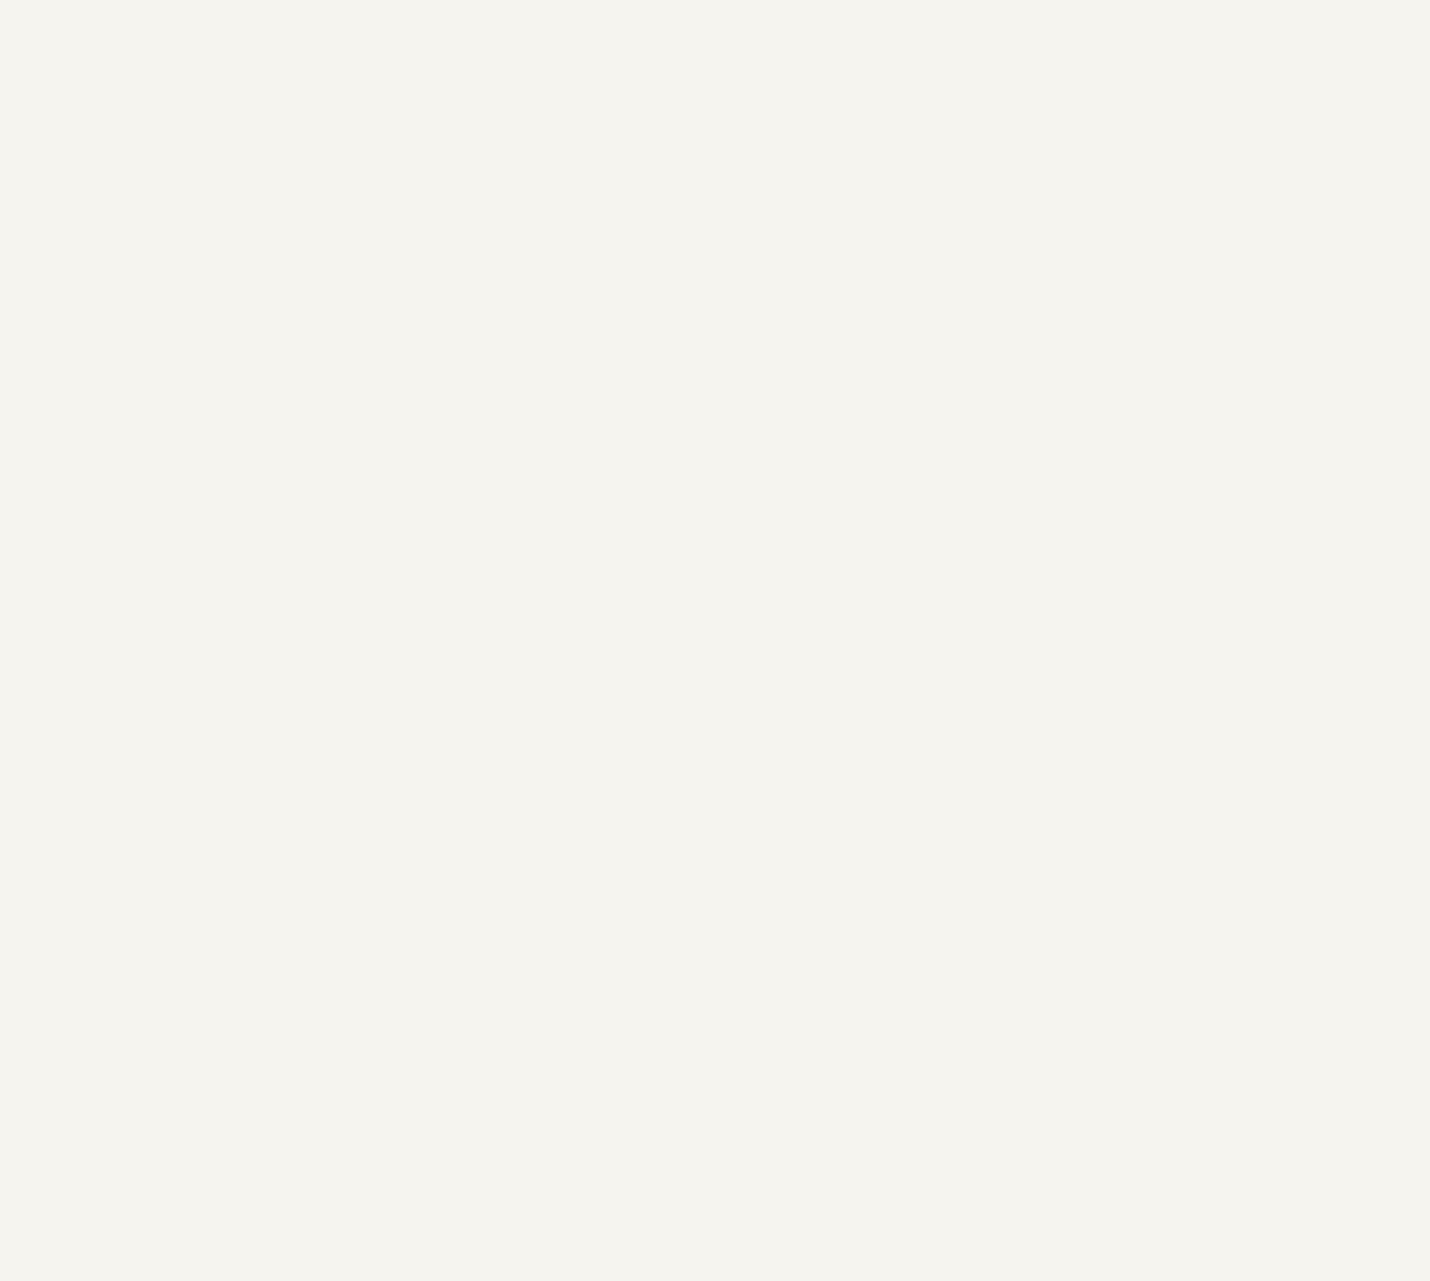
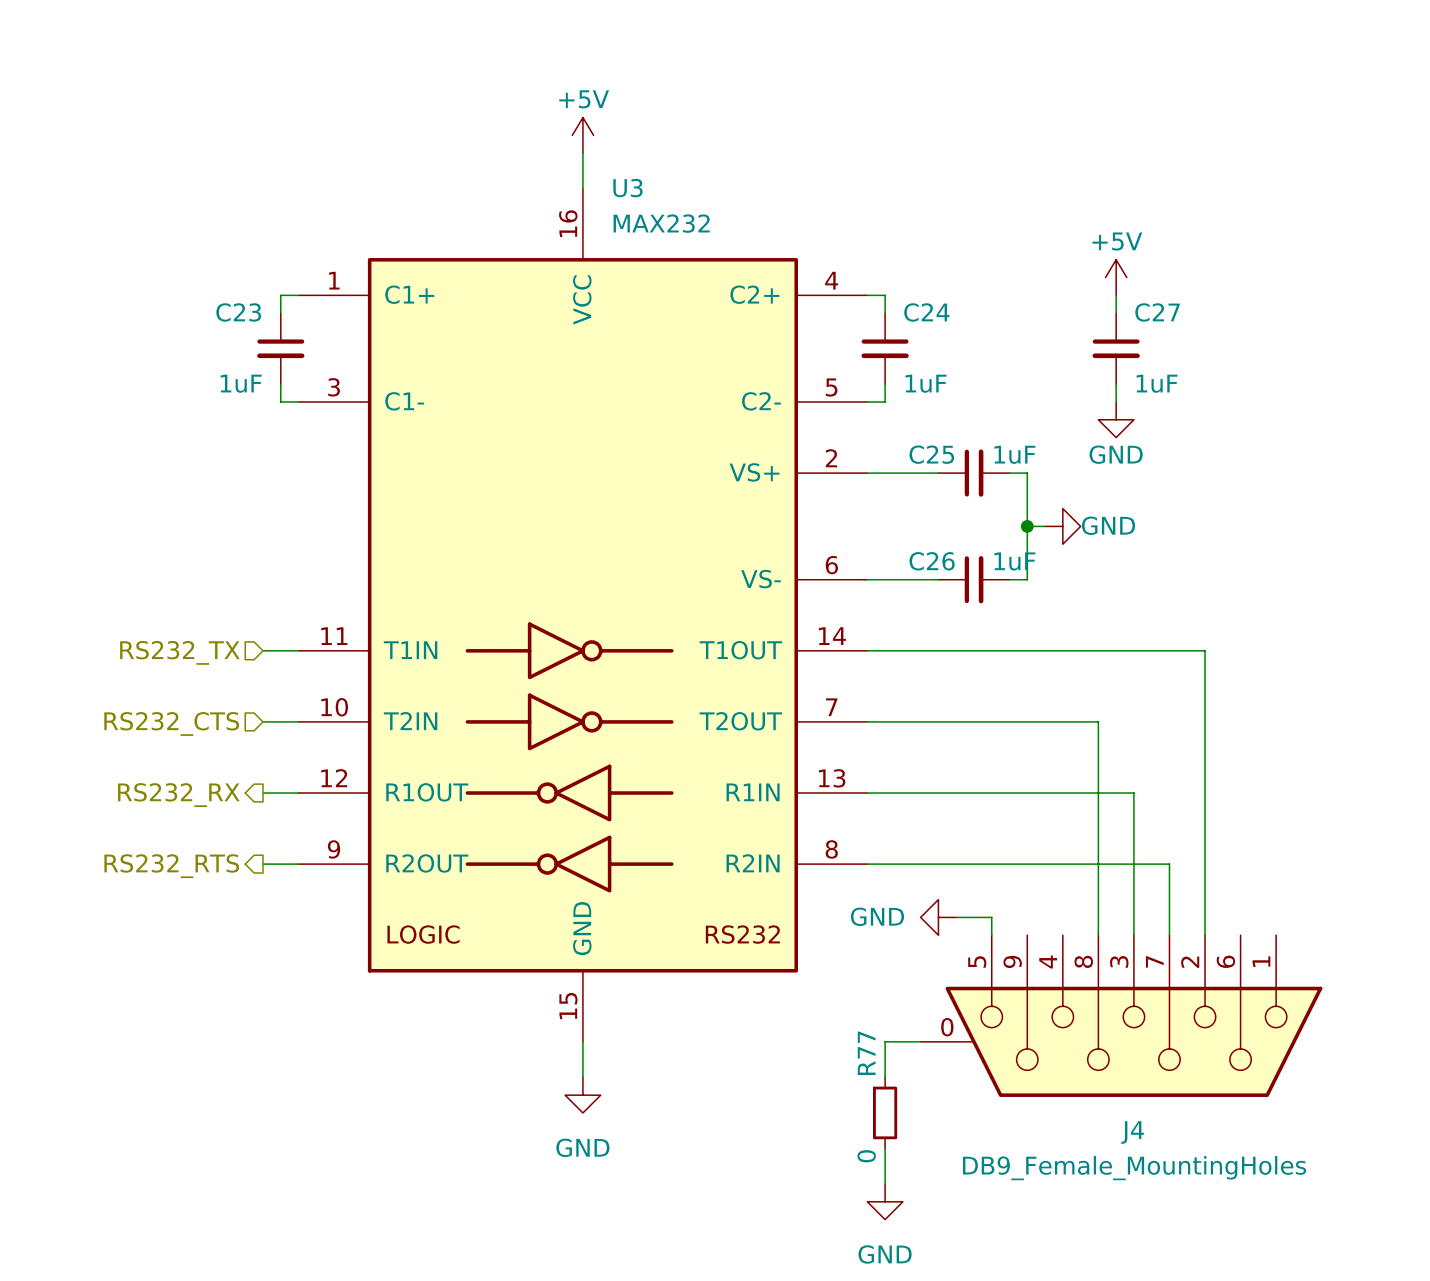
power symbol: none -> +5V (582, 135)
wire: none -> (582, 153) (582, 188)
power symbol: none -> +5V (1116, 277)
wire: none -> (298, 295) (280, 295) (280, 313)
wire: none -> (867, 295) (885, 295) (885, 313)
wire: none -> (1116, 295) (1116, 313)
C23: none -> 1uF (280, 348)
C24: none -> 1uF (885, 348)
C27: none -> 1uF (1116, 348)
wire: none -> (280, 384) (280, 401) (298, 401)
wire: none -> (885, 384) (885, 401) (867, 401)
wire: none -> (1116, 384) (1116, 401)
power symbol: none -> GND (1116, 419)
wire: none -> (867, 473) (938, 473)
C25: none -> 1uF (973, 473)
wire: none -> (1009, 473) (1027, 473) (1027, 579) (1009, 579)
wire: none -> (1027, 526) (1045, 526)
junction: none -> (1027, 526)
power symbol: none -> GND (1062, 526)
wire: none -> (867, 579) (938, 579)
C26: none -> 1uF (973, 579)
U3: none -> MAX232 (582, 615)
wire: none -> (263, 650) (298, 650)
wire: none -> (867, 650) (1205, 650) (1205, 935)
hierarchical label: none -> RS232_TX (179, 652)
wire: none -> (263, 721) (298, 721)
wire: none -> (867, 721) (1098, 721) (1098, 935)
hierarchical label: none -> RS232_CTS (171, 723)
wire: none -> (263, 793) (298, 793)
wire: none -> (867, 793) (1133, 793) (1133, 935)
hierarchical label: none -> RS232_RX (178, 795)
wire: none -> (263, 864) (298, 864)
wire: none -> (867, 864) (1169, 864) (1169, 935)
hierarchical label: none -> RS232_RTS (171, 866)
power symbol: none -> GND (938, 917)
wire: none -> (956, 917) (991, 917) (991, 935)
J4: none -> DB9_Female_MountingHoles (1121, 1016)
wire: none -> (582, 1041) (582, 1077)
wire: none -> (920, 1041) (885, 1041) (885, 1077)
power symbol: none -> GND (582, 1095)
R77: none -> 0 (885, 1112)
wire: none -> (885, 1148) (885, 1184)
power symbol: none -> GND (885, 1201)

